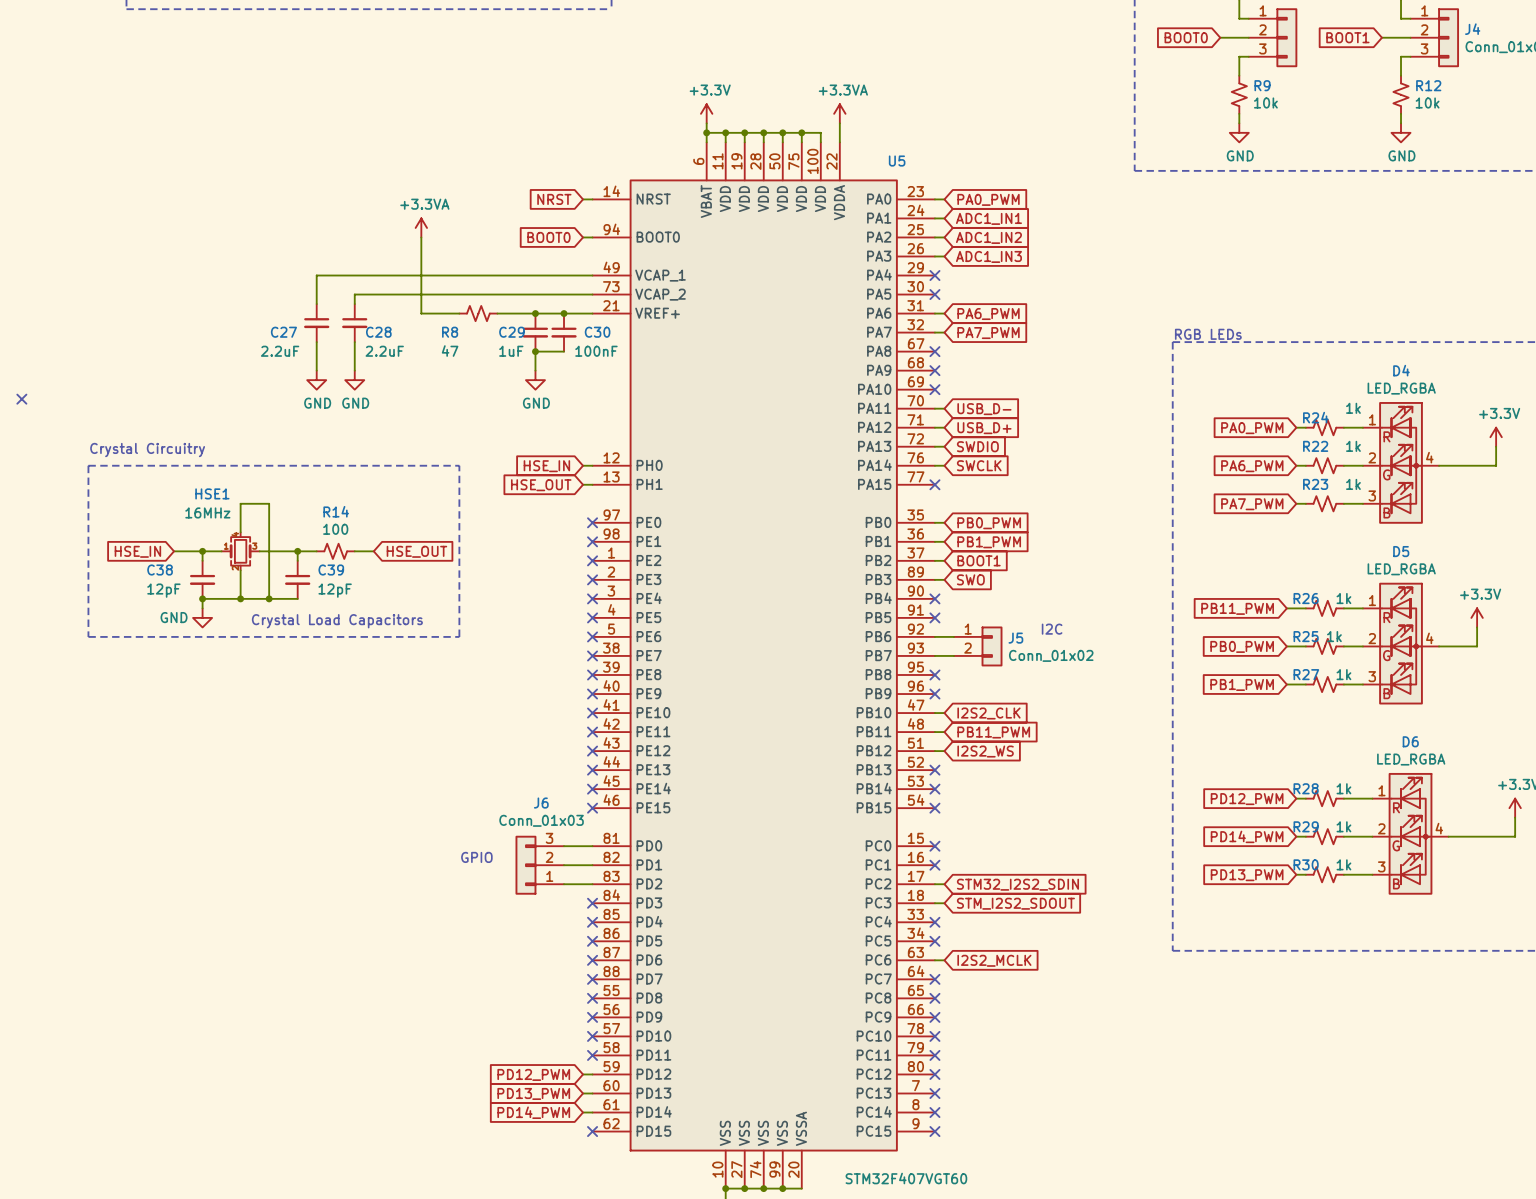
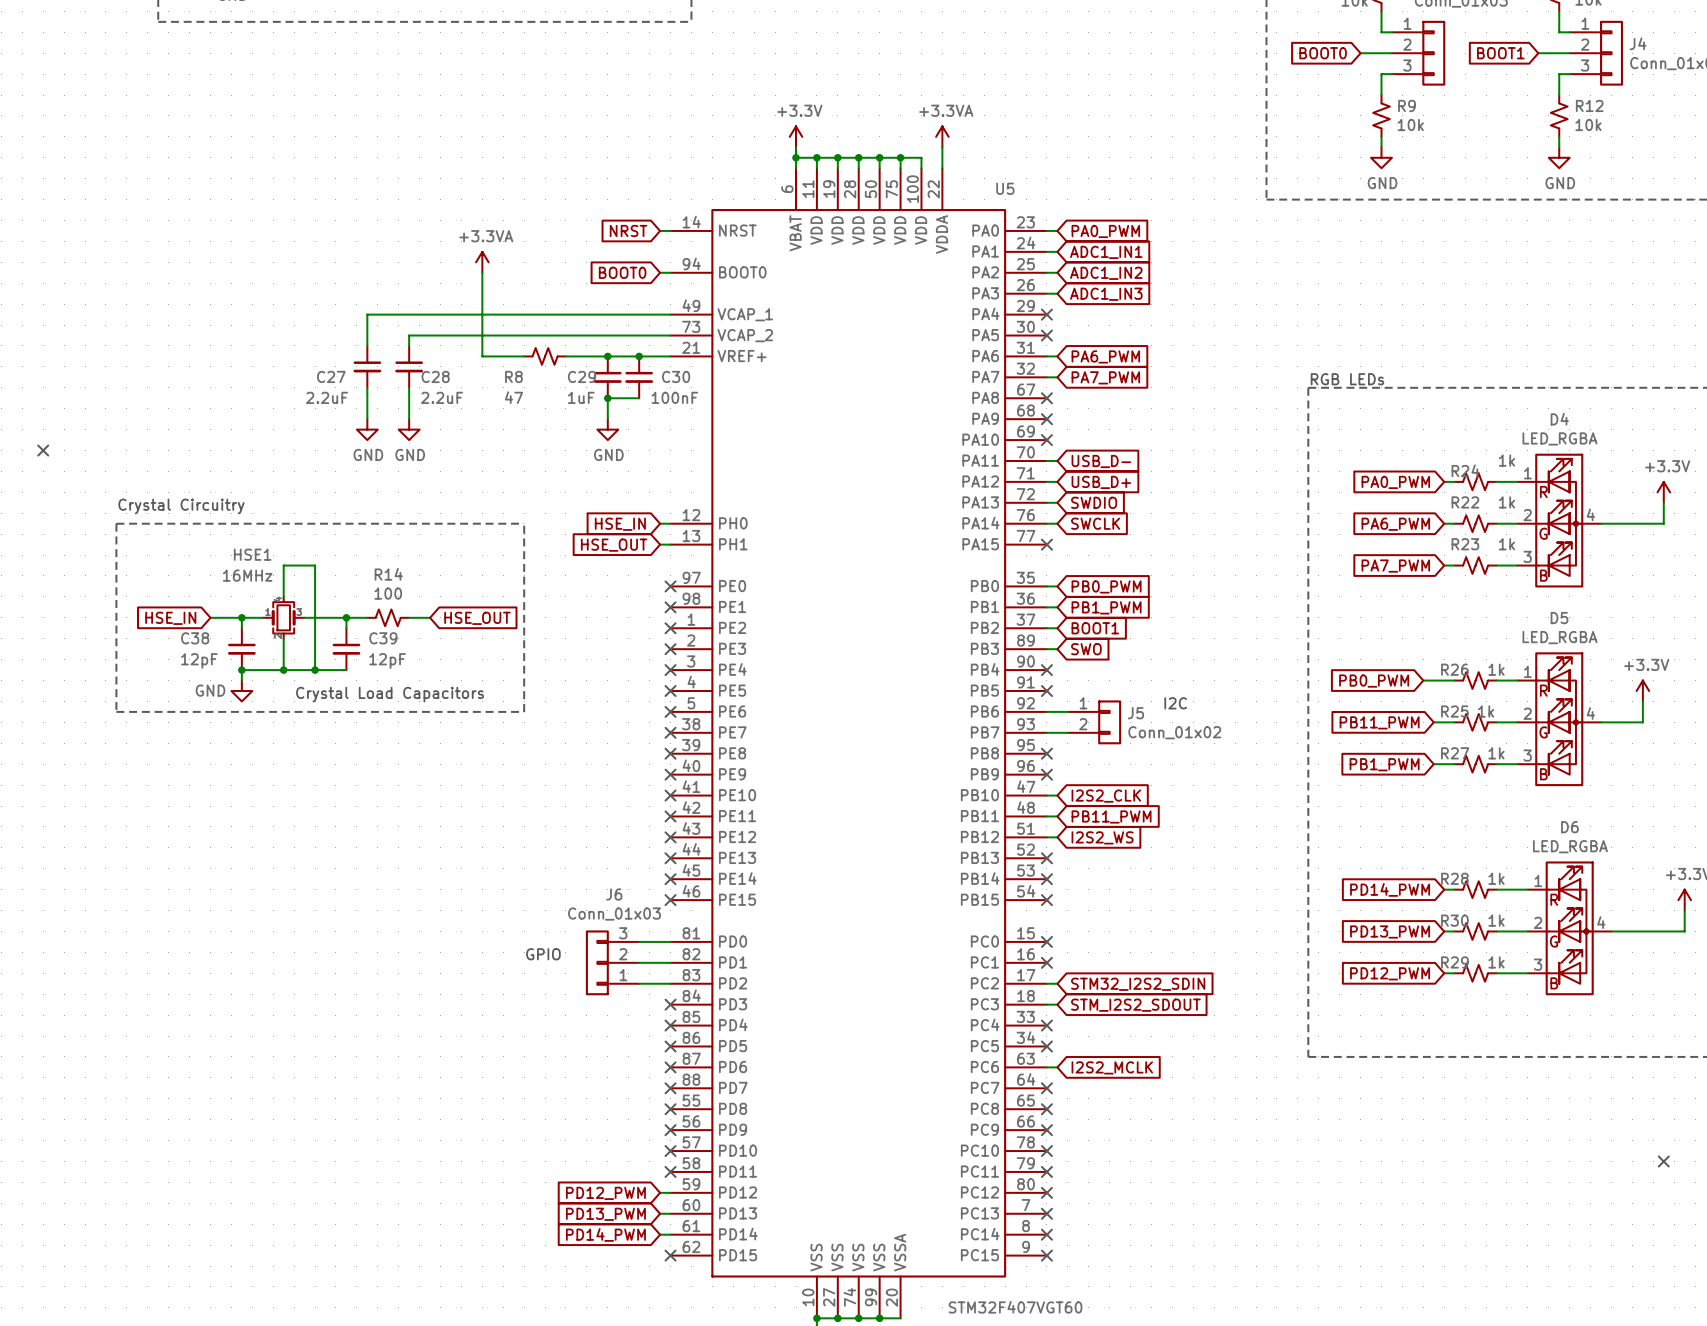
global label: PB11_PWM (1237, 608) -> PB0_PWM (1374, 681)
wire: none -> (1423, 680) (1433, 680)
global label: PB0_PWM (1242, 646) -> PB11_PWM (1379, 722)
global label: PD12_PWM (1247, 799) -> PD14_PWM (1390, 889)
R29 name: R29 (1306, 826) -> R30 (1454, 920)
global label: PD14_PWM (1247, 836) -> PD13_PWM (1390, 931)
R30 name: R30 (1306, 864) -> R29 (1454, 962)
global label: PD13_PWM (1247, 875) -> PD12_PWM (1390, 973)
no-connect mark: none -> (1663, 1161)

